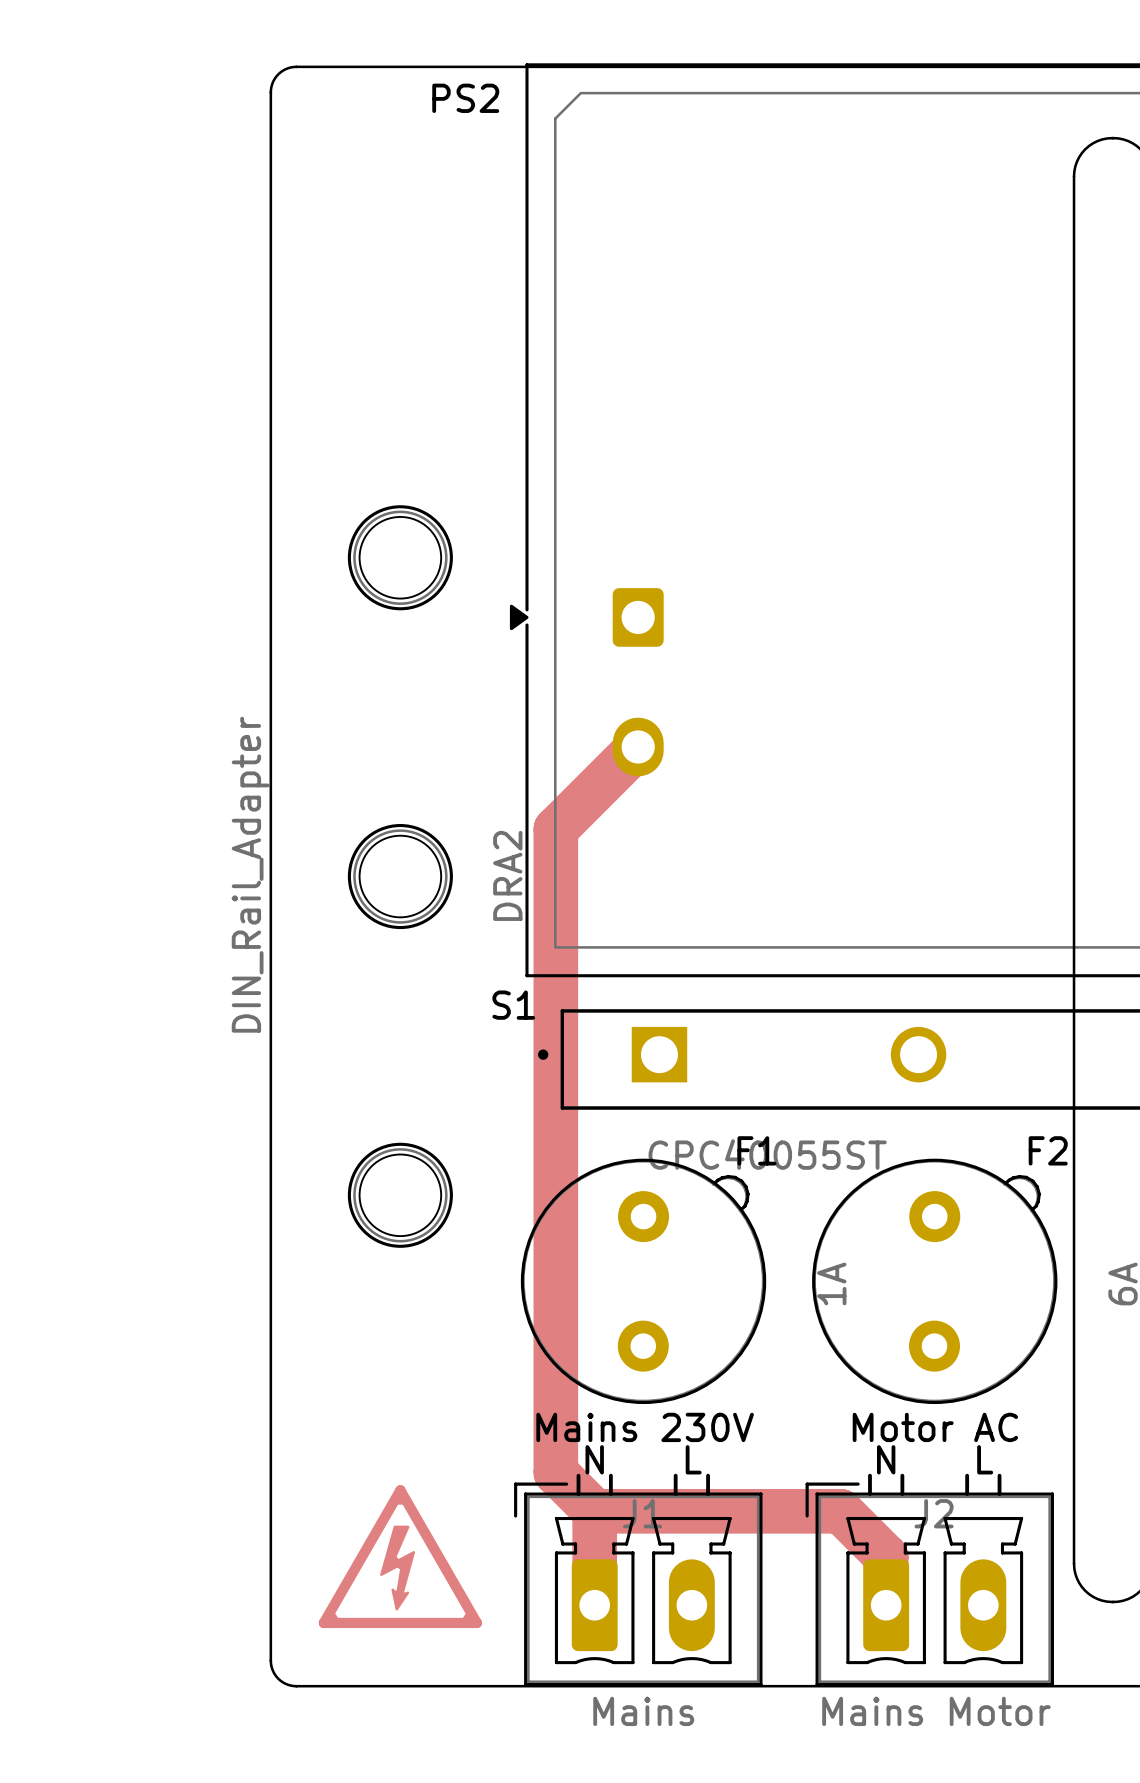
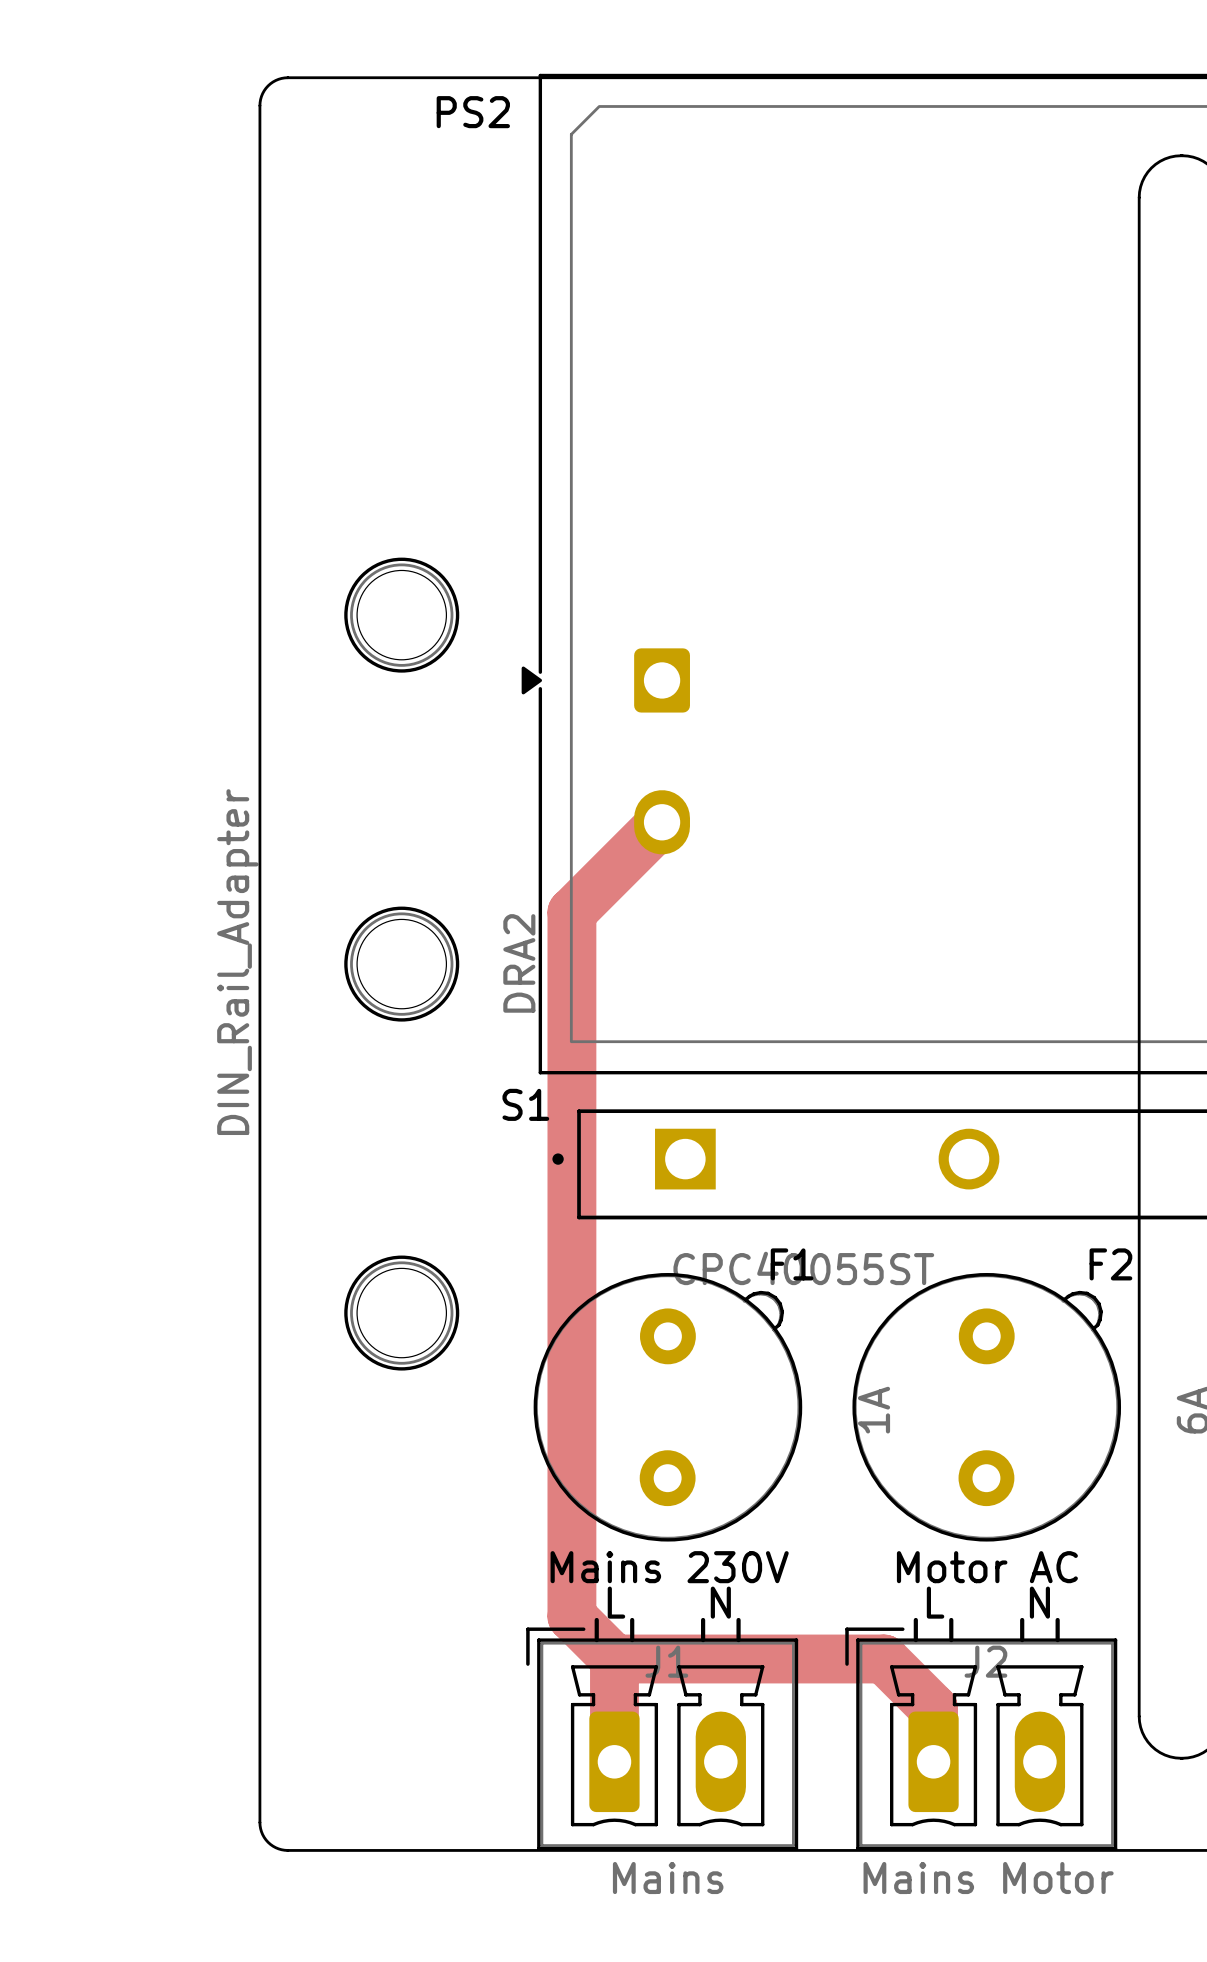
text: N (594, 1459) -> L (616, 1602)
text: L (693, 1459) -> N (720, 1602)
text: N (886, 1459) -> L (935, 1602)
text: L (985, 1459) -> N (1039, 1602)
drawing: [318, 1485, 482, 1629] -> none

